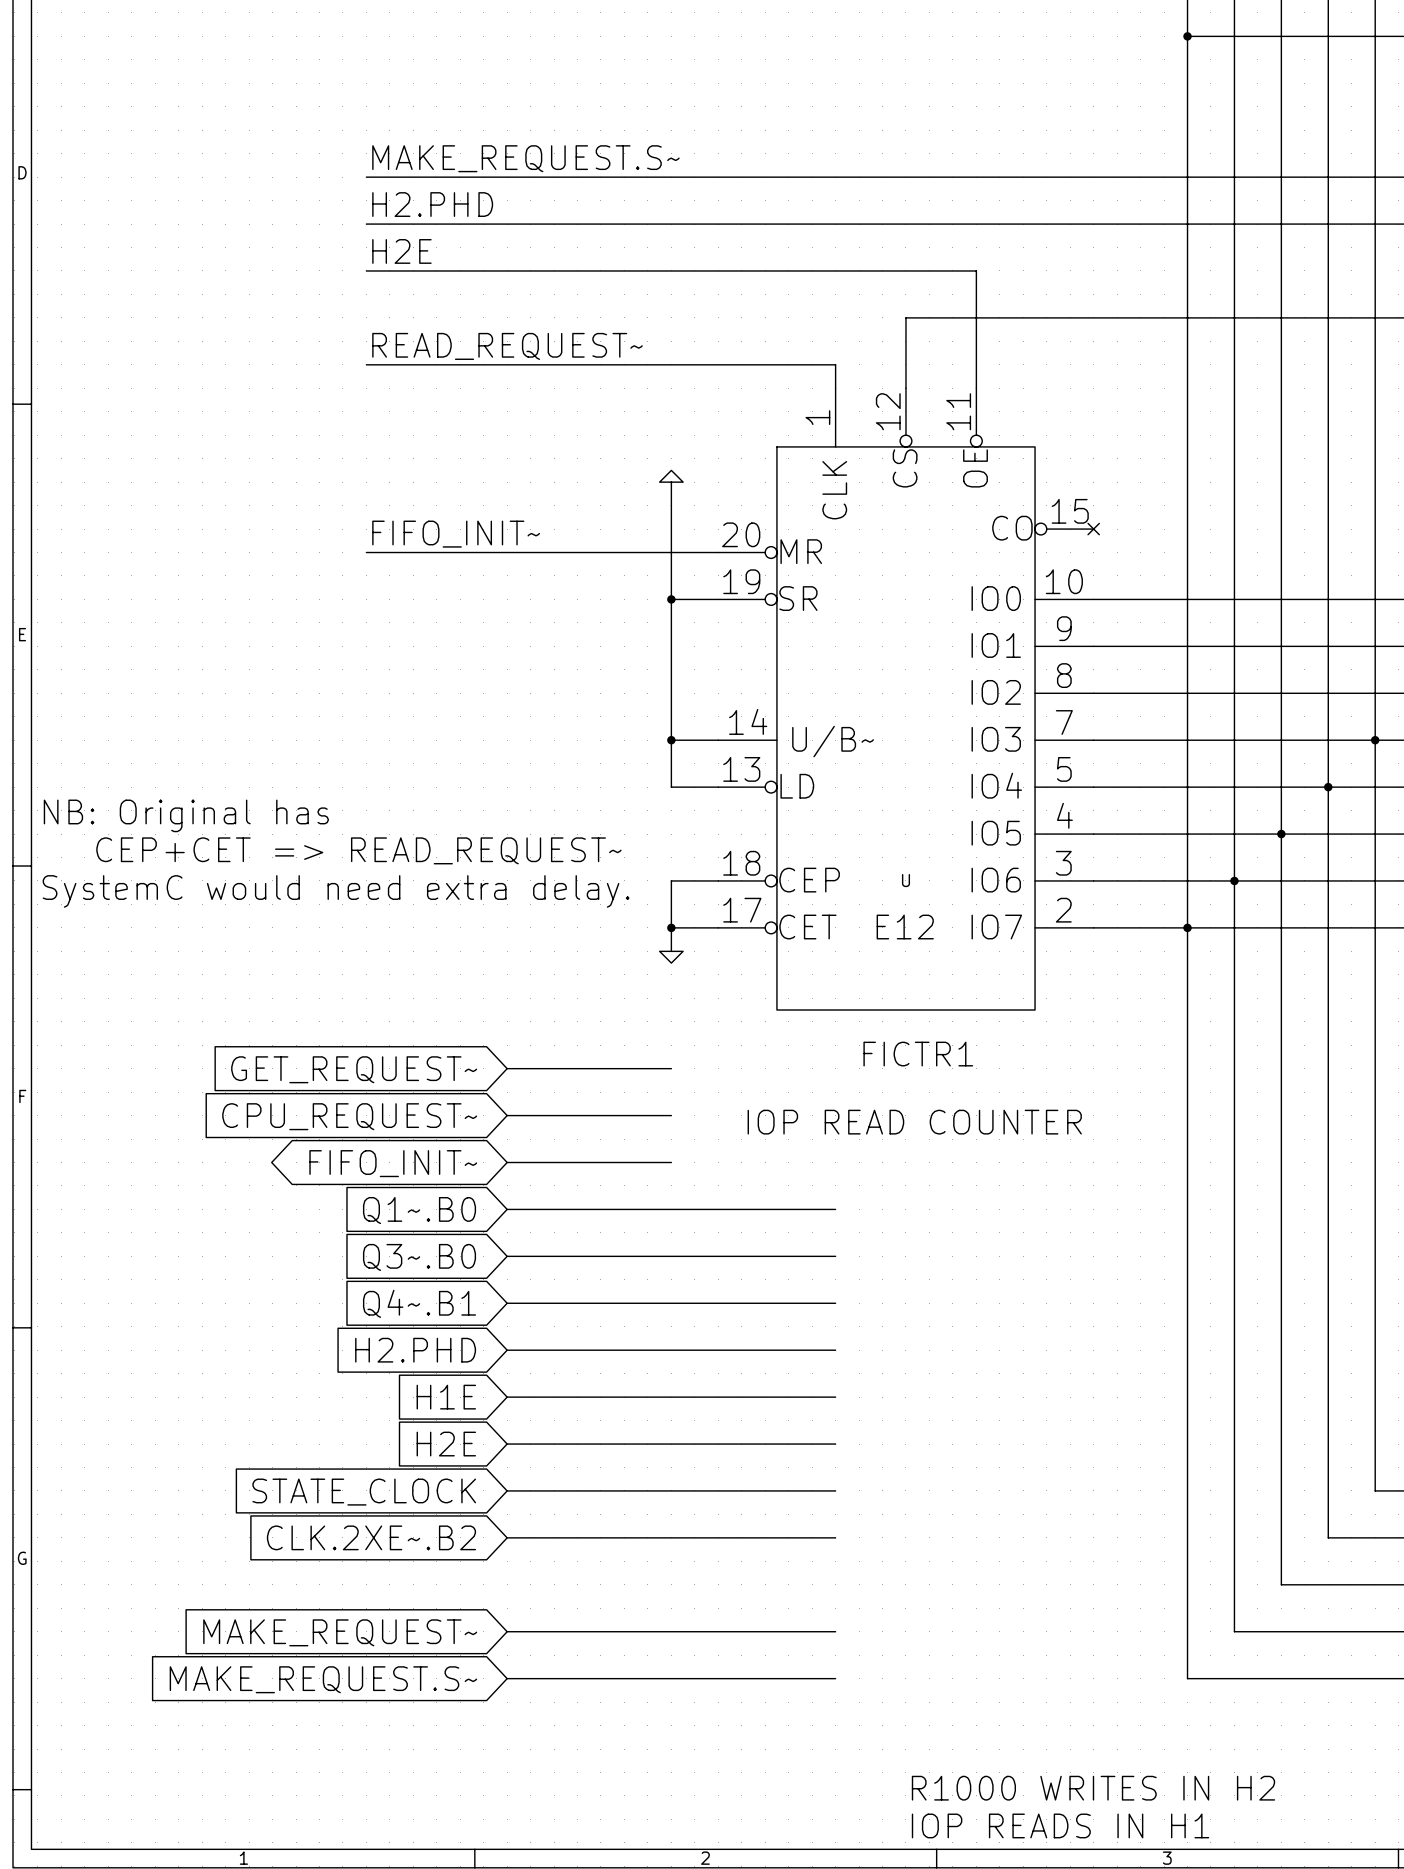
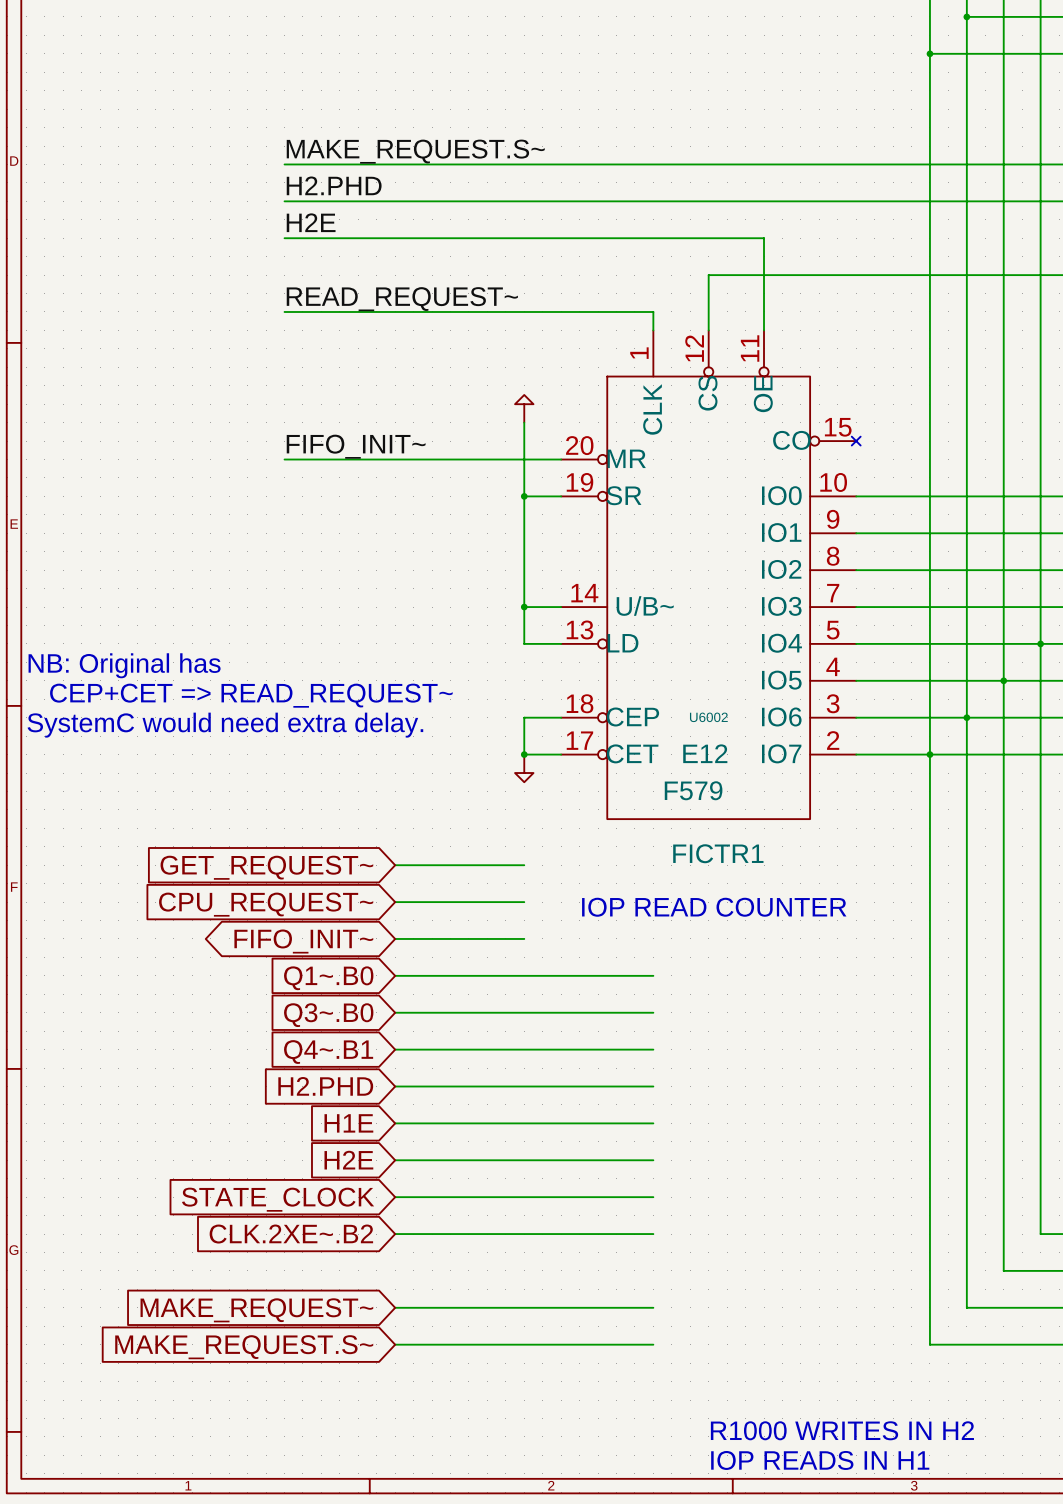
U name: U (905, 880) -> U6002 (708, 717)
U value: none -> F579 (693, 790)

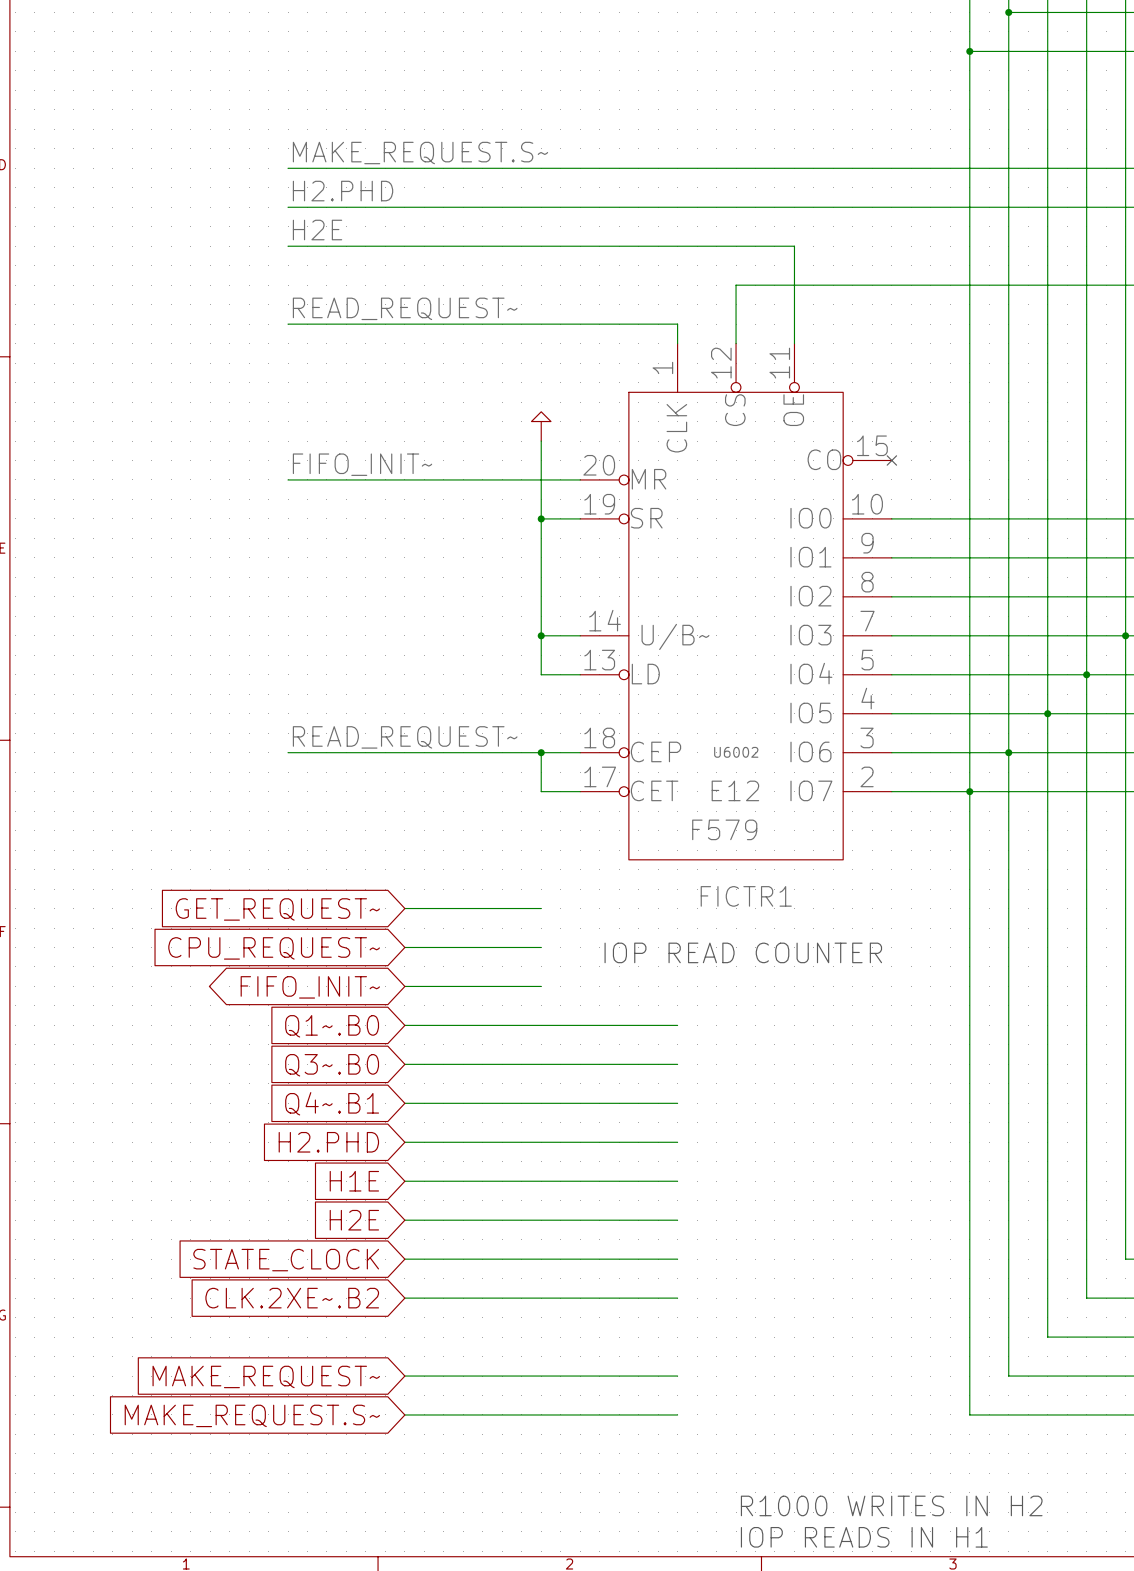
text: NB: Original has (124, 665) -> none
text: CEP+CET => READ_REQUEST~ (251, 695) -> none
label: none -> READ_REQUEST~ (405, 737)
wire: none -> (288, 752) (541, 752)
text: SystemC would need extra delay. (225, 725) -> none
junction position: (524, 754) -> (541, 752)
power symbol: (524, 768) -> none

